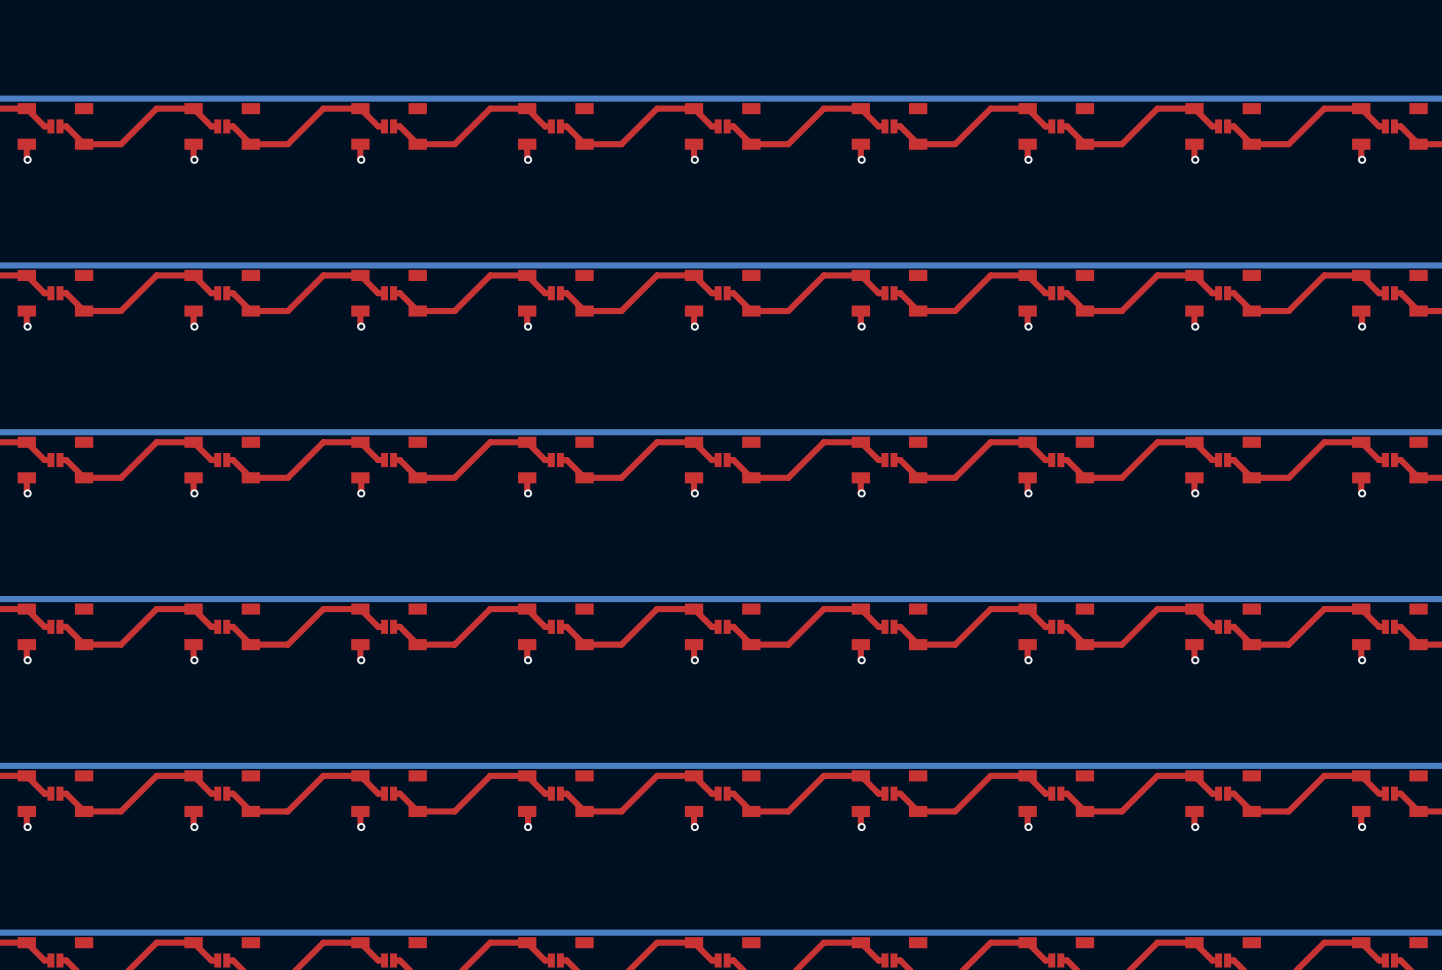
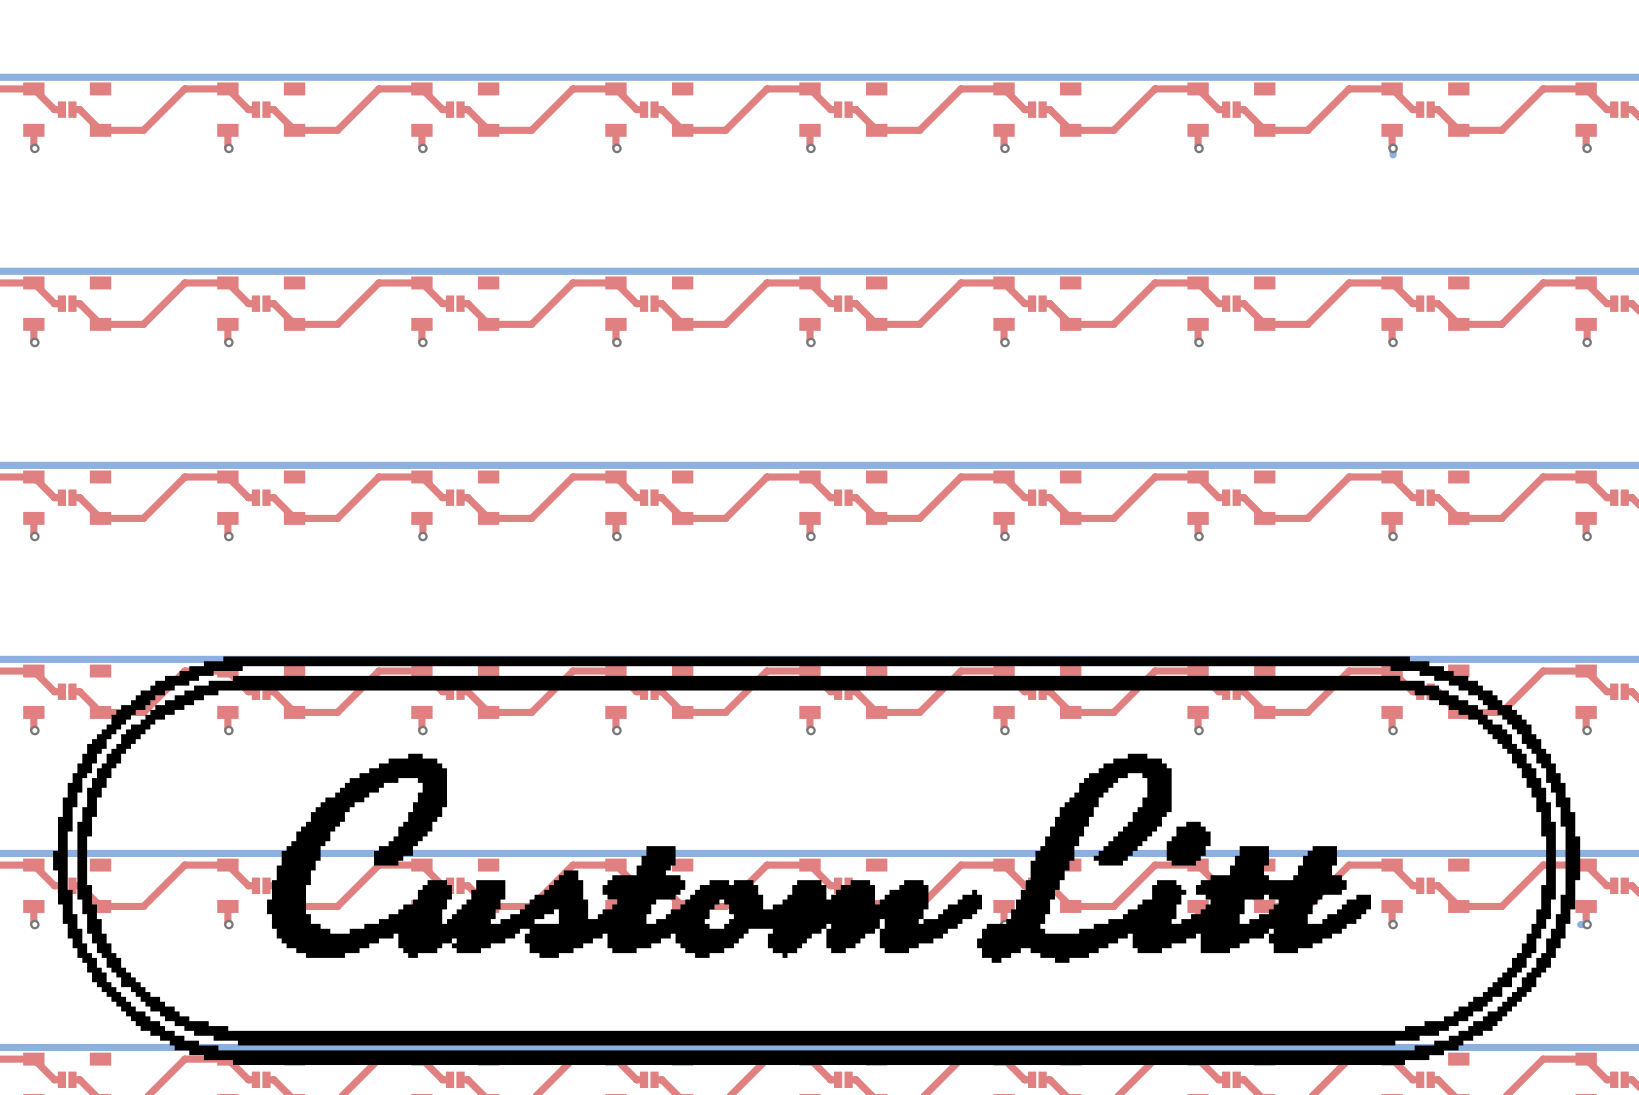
bottom track: none -> (1393, 148) (1393, 154)
drawing: none -> [53, 656, 1581, 1066]
bottom track: none -> (1587, 924) (1580, 924)

